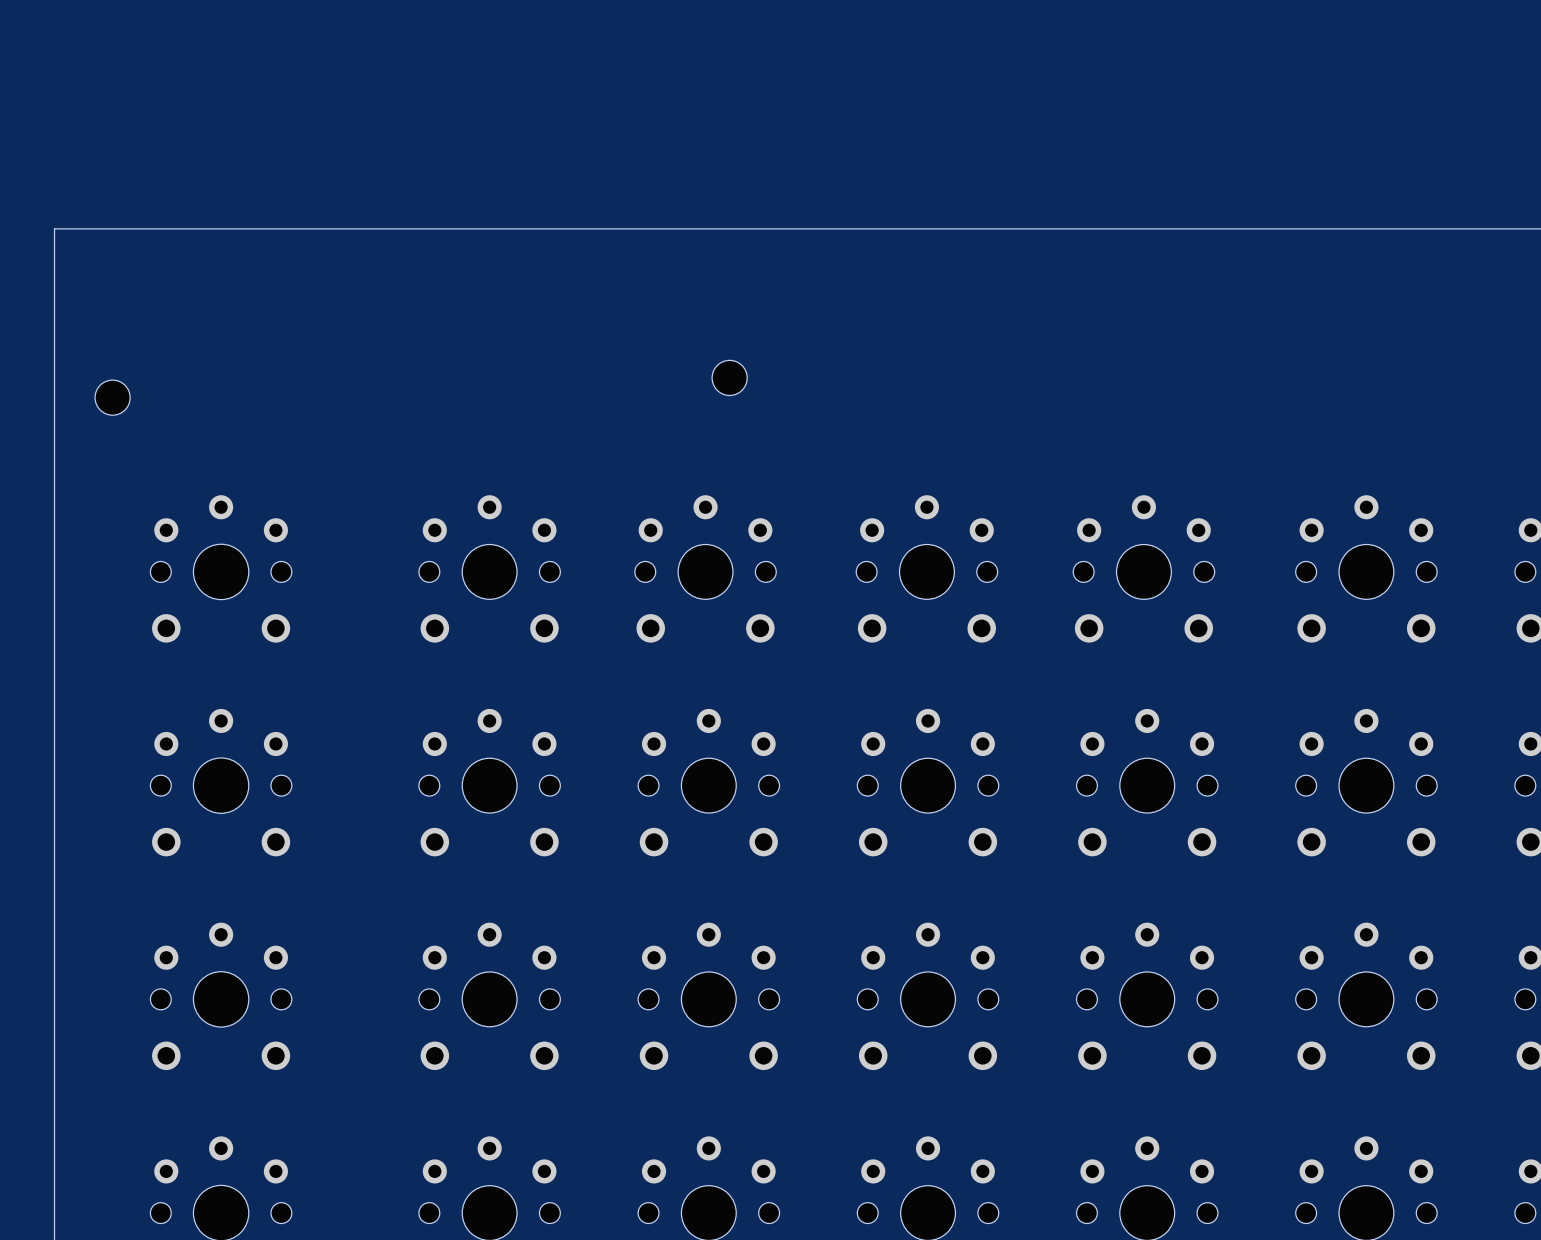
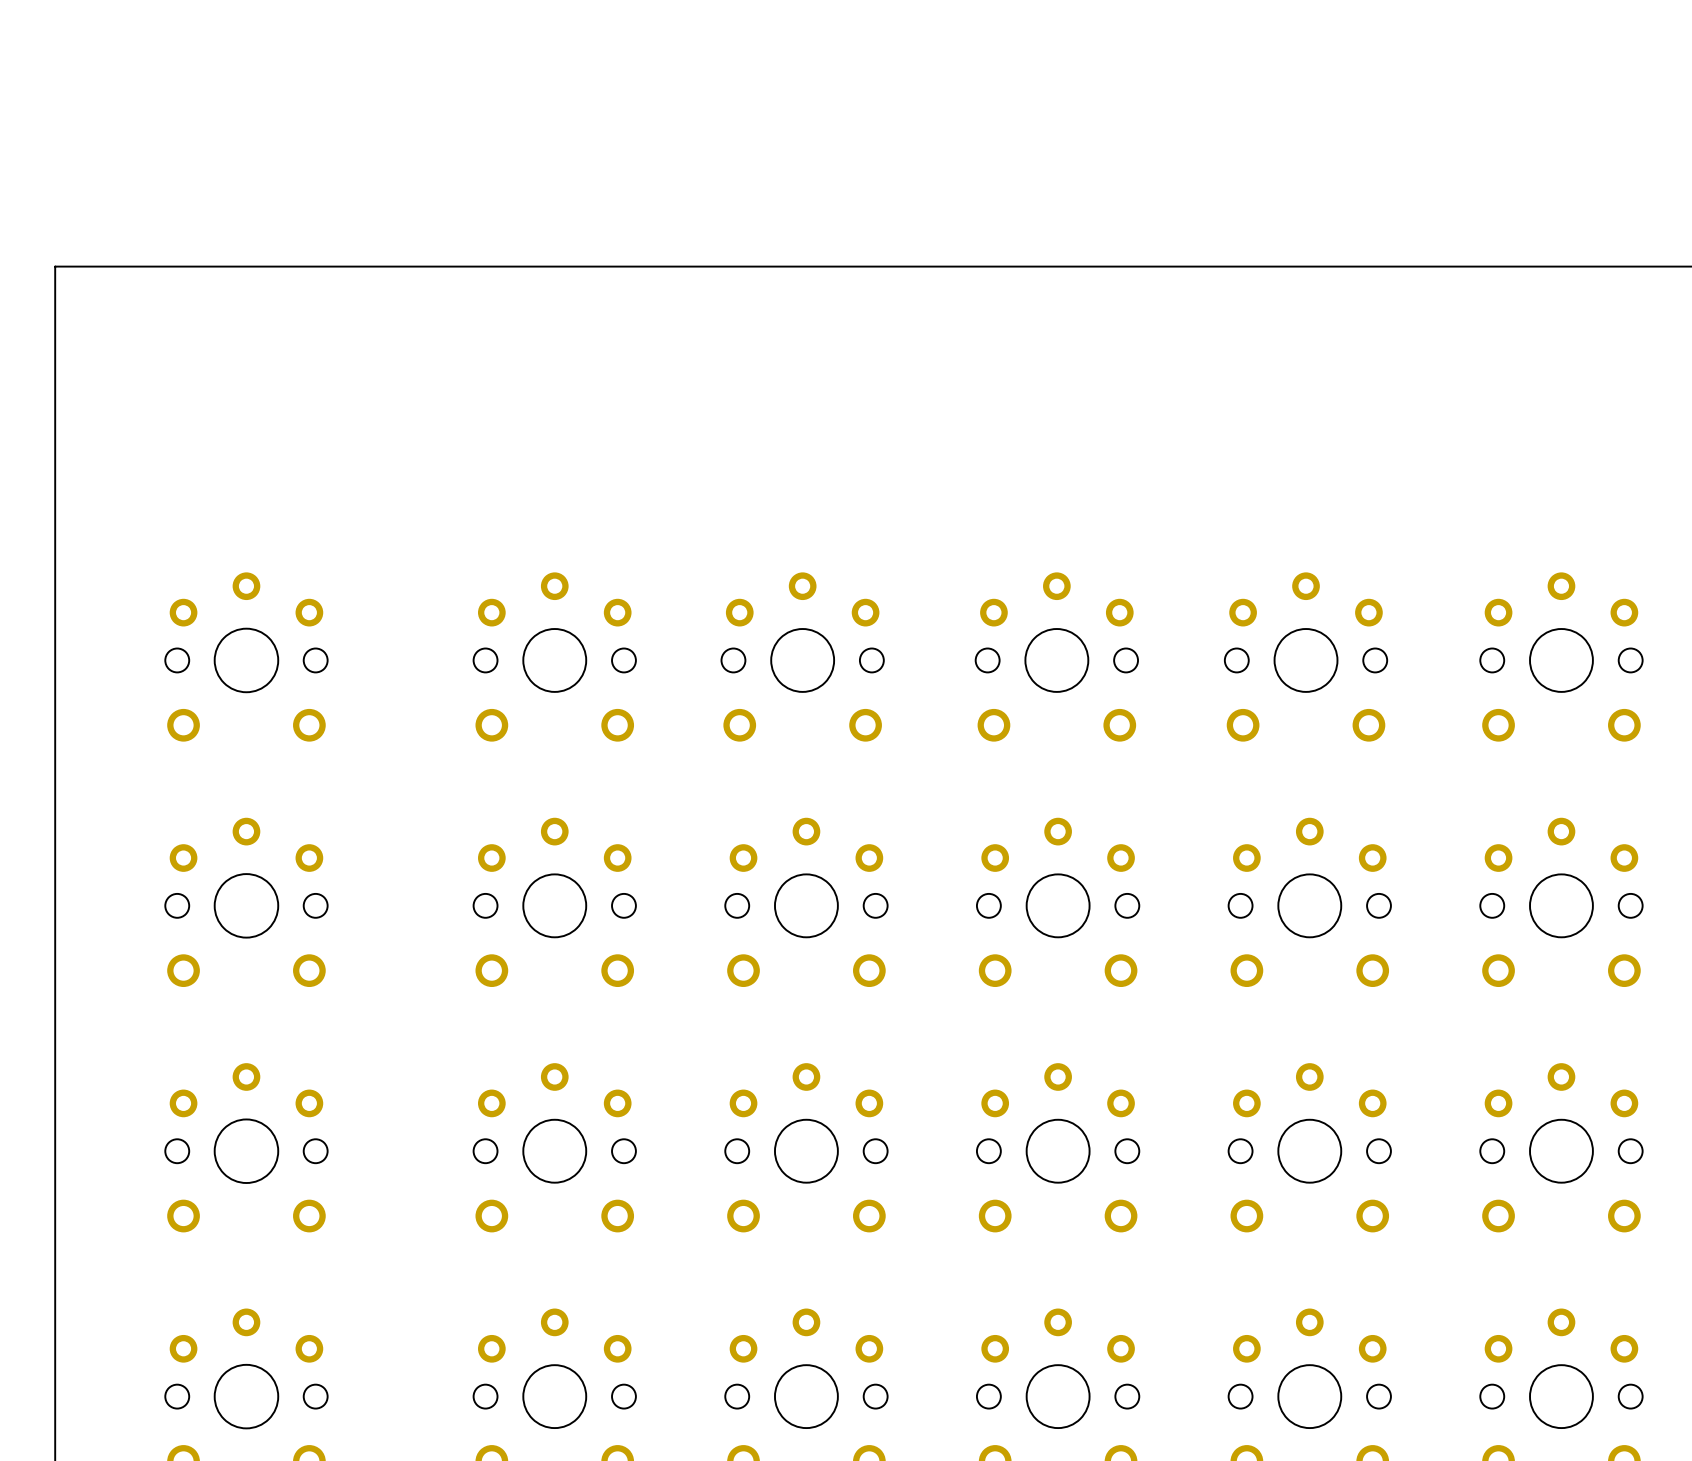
part: (729, 377) -> none
part: (112, 397) -> none

